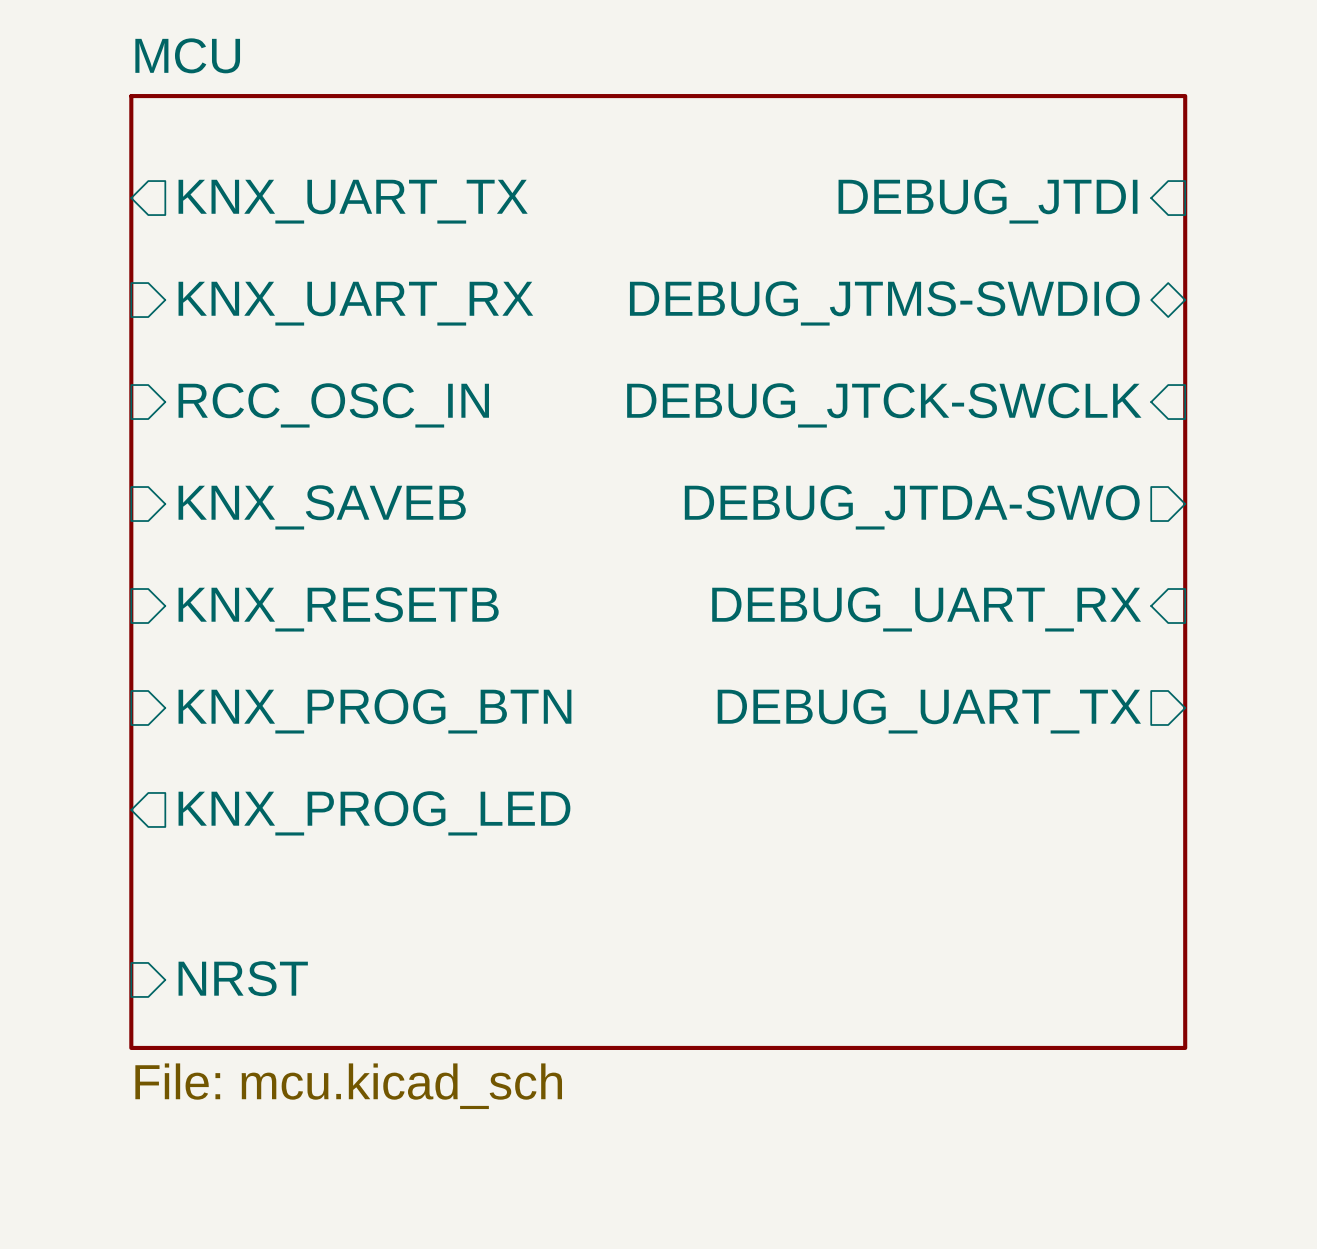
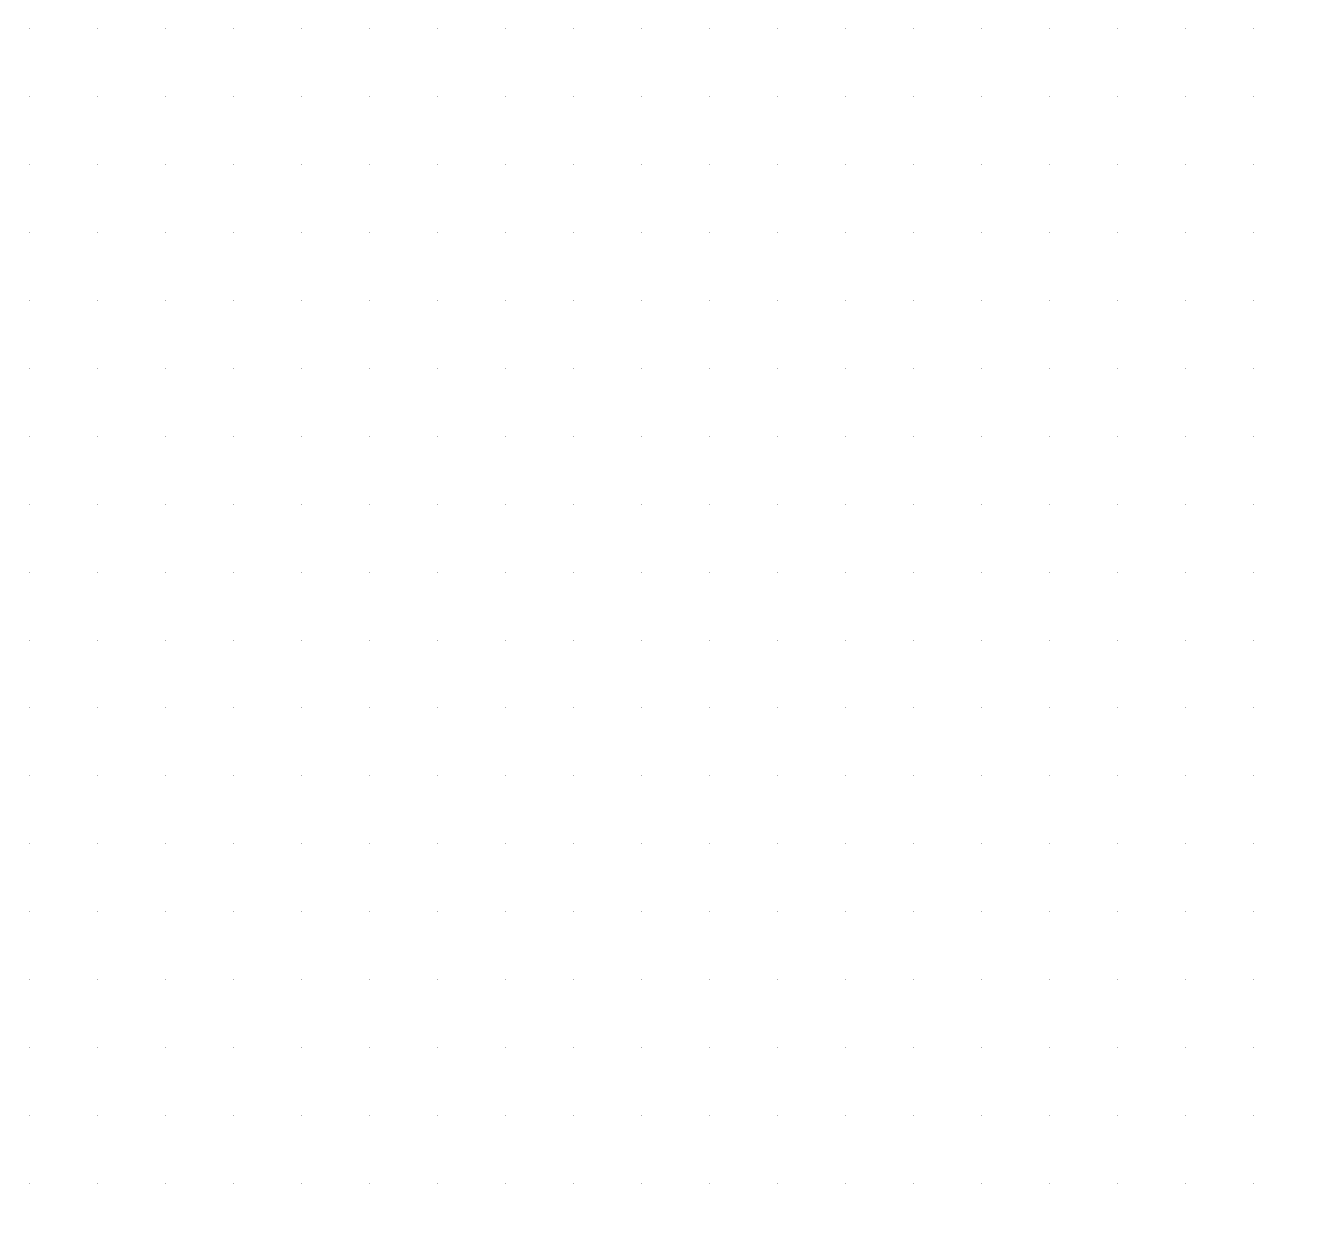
sheet pin: KNX_UART_TX (353, 201) -> none
sheet pin: DEBUG_JTDI (988, 201) -> none
sheet pin: KNX_UART_RX (355, 303) -> none
sheet pin: DEBUG_JTMS-SWDIO (884, 303) -> none
sheet pin: RCC_OSC_IN (333, 405) -> none
sheet pin: DEBUG_JTCK-SWCLK (884, 405) -> none
sheet pin: KNX_SAVEB (322, 507) -> none
sheet pin: DEBUG_JTDA-SWO (912, 507) -> none
sheet MCU: File: mcu.kicad_sch (658, 572) -> none
sheet pin: KNX_RESETB (338, 609) -> none
sheet pin: DEBUG_UART_RX (926, 609) -> none
sheet pin: KNX_PROG_BTN (374, 711) -> none
sheet pin: DEBUG_UART_TX (929, 711) -> none
sheet pin: KNX_PROG_LED (374, 813) -> none
sheet pin: NRST (243, 978) -> none

